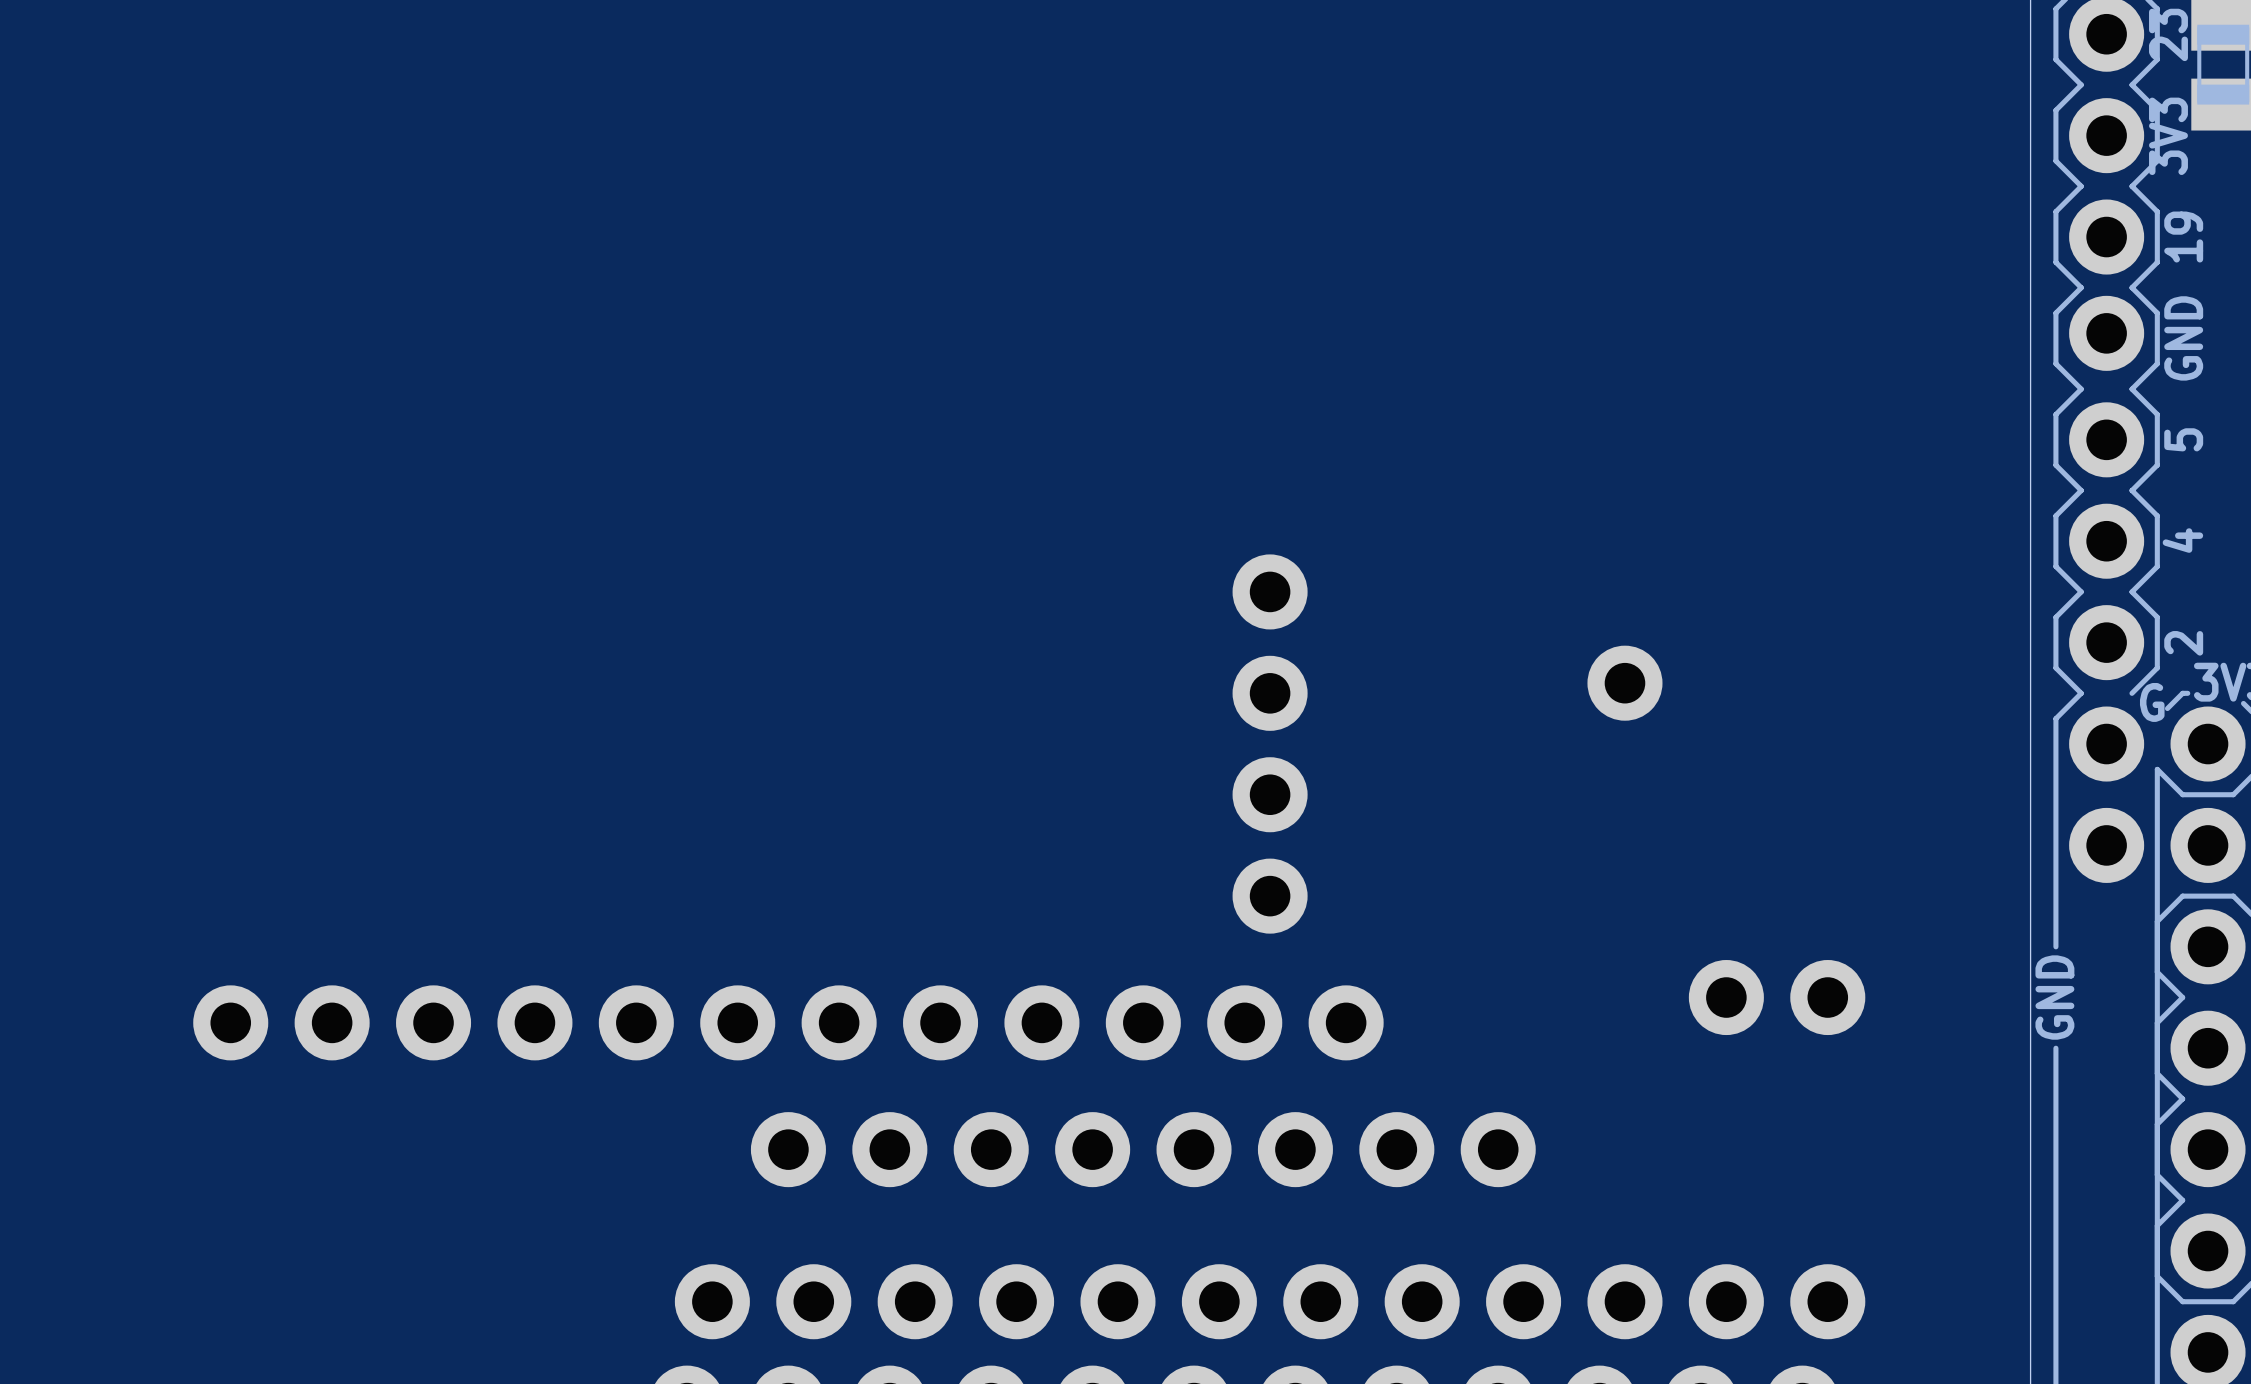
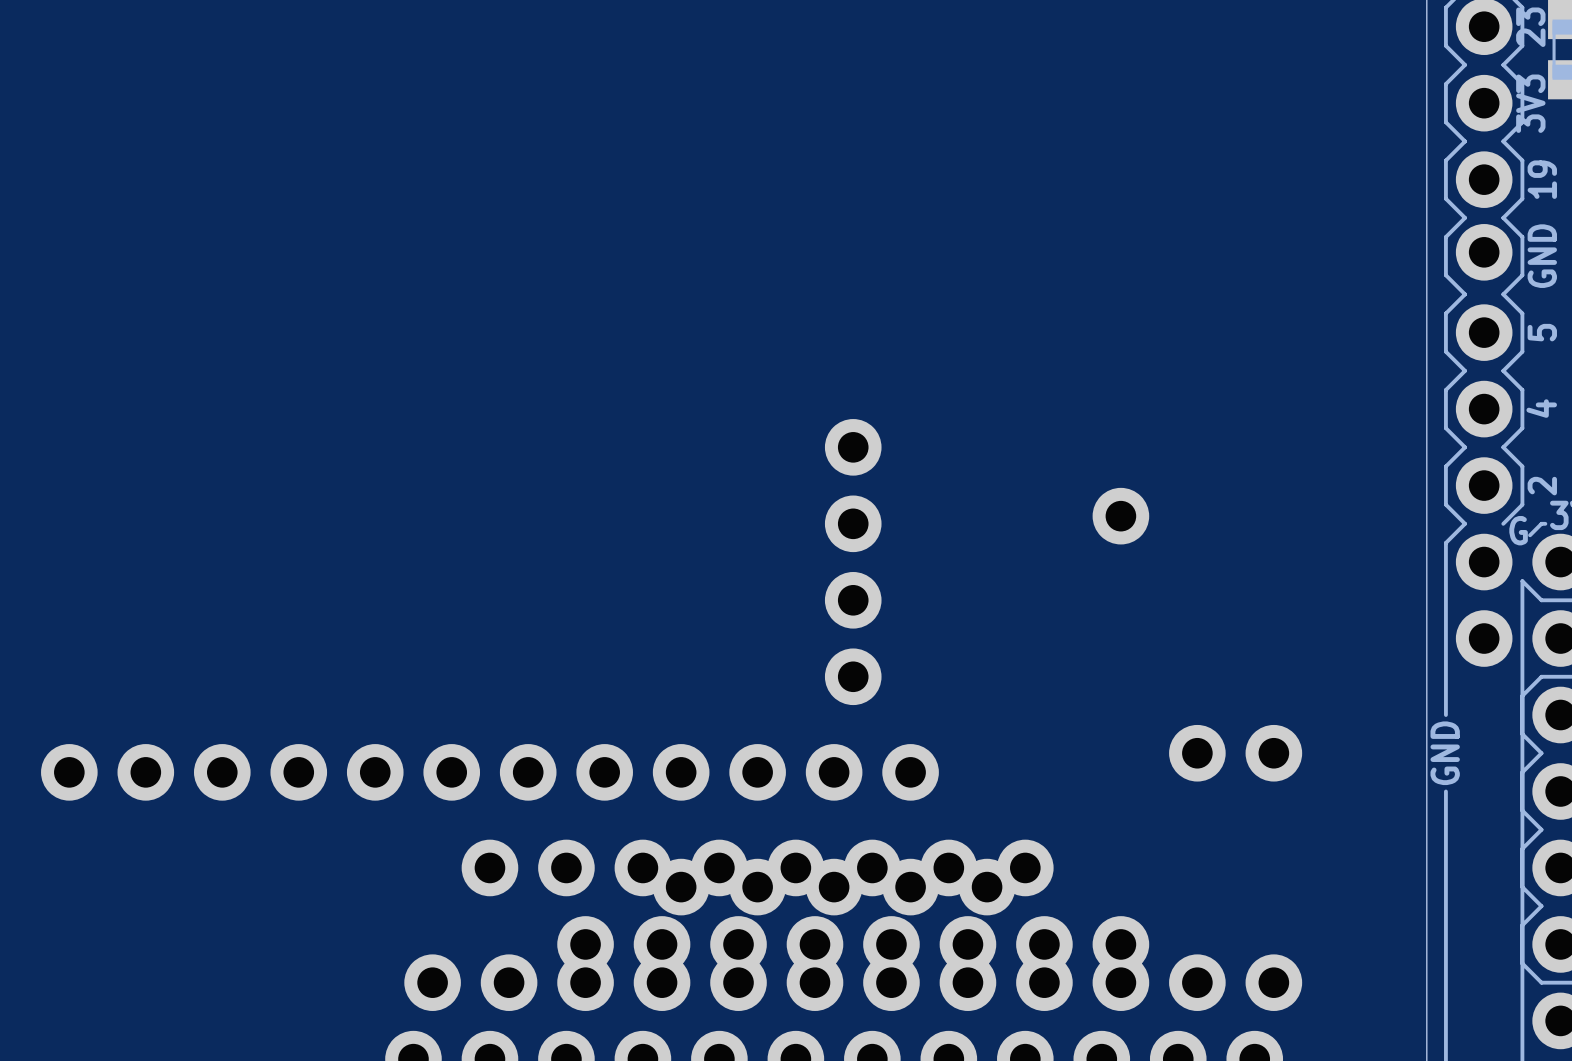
part: none -> (834, 887)
part: none -> (853, 944)

